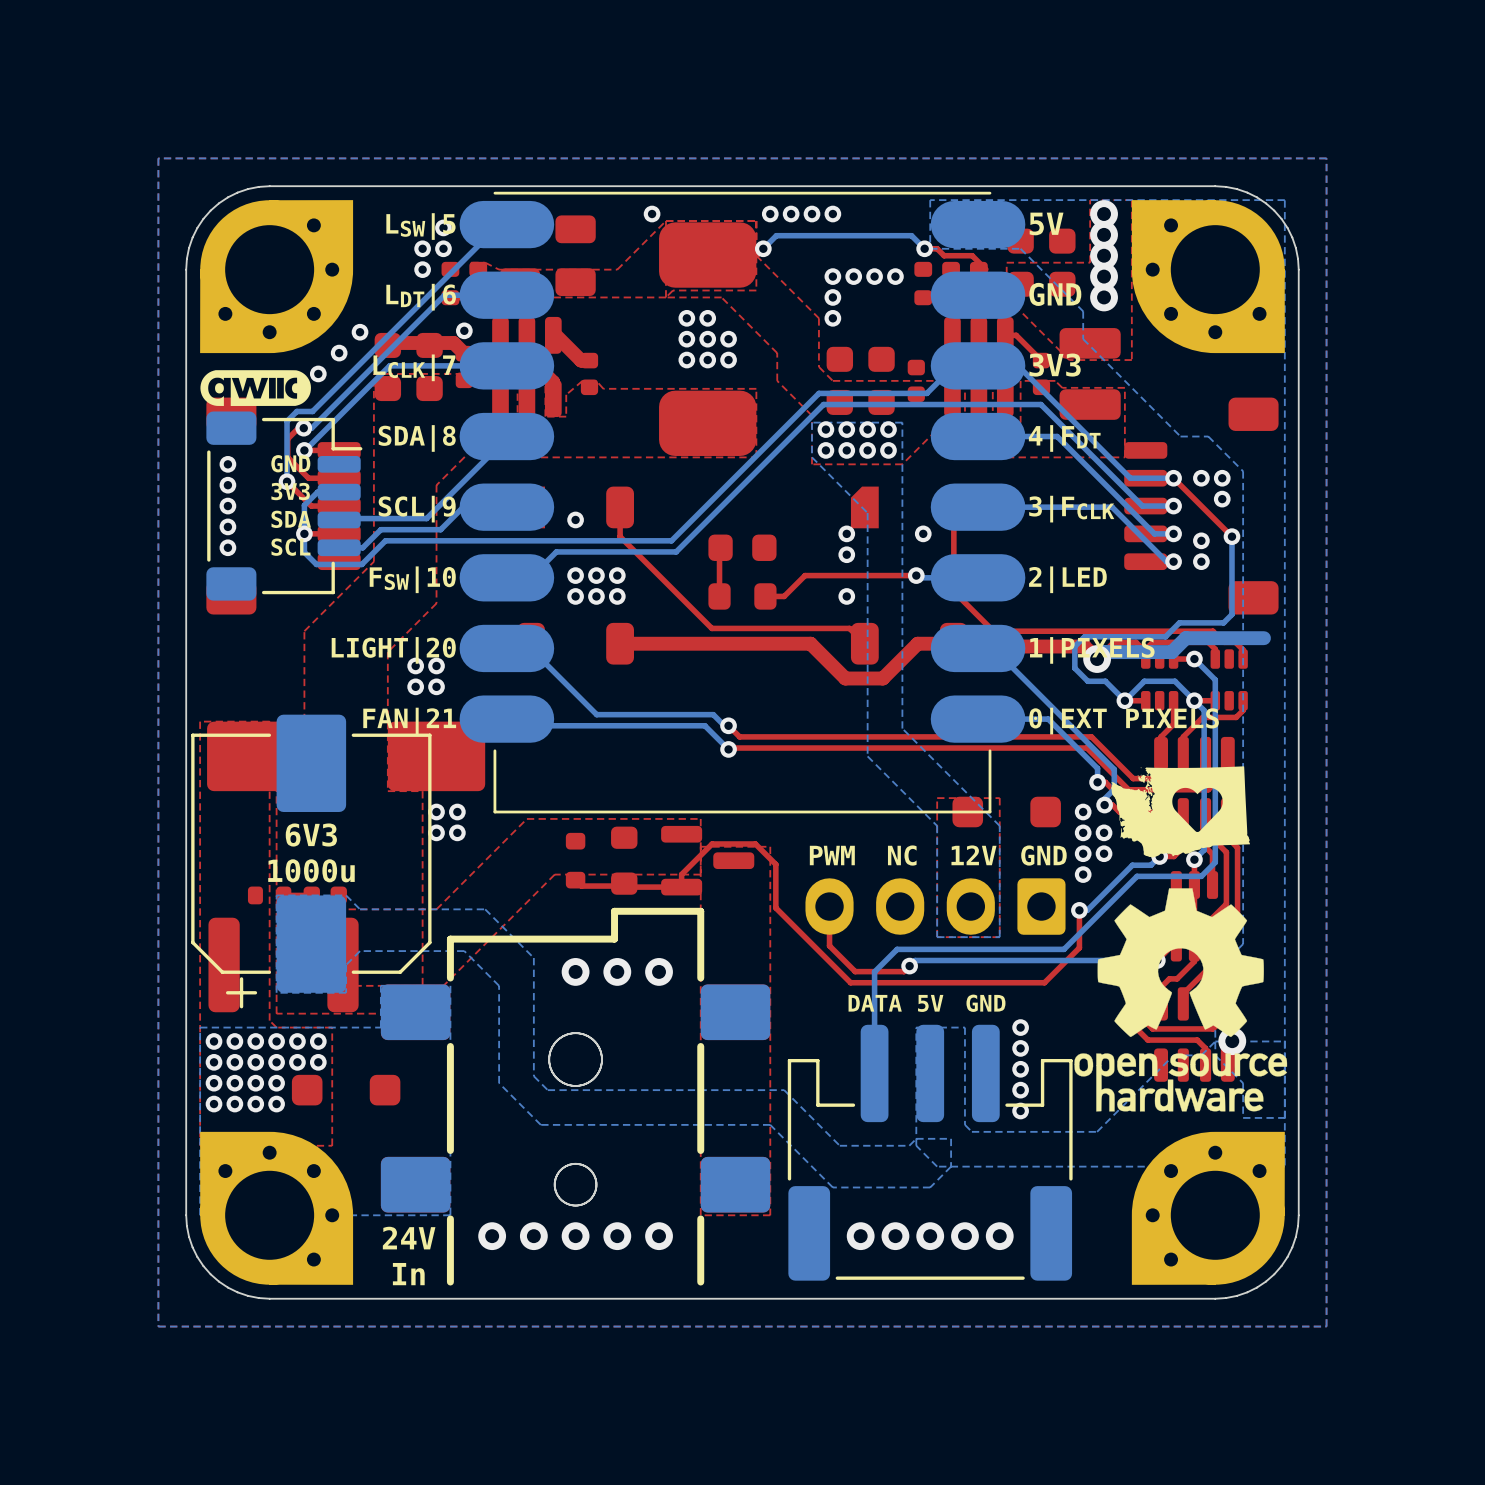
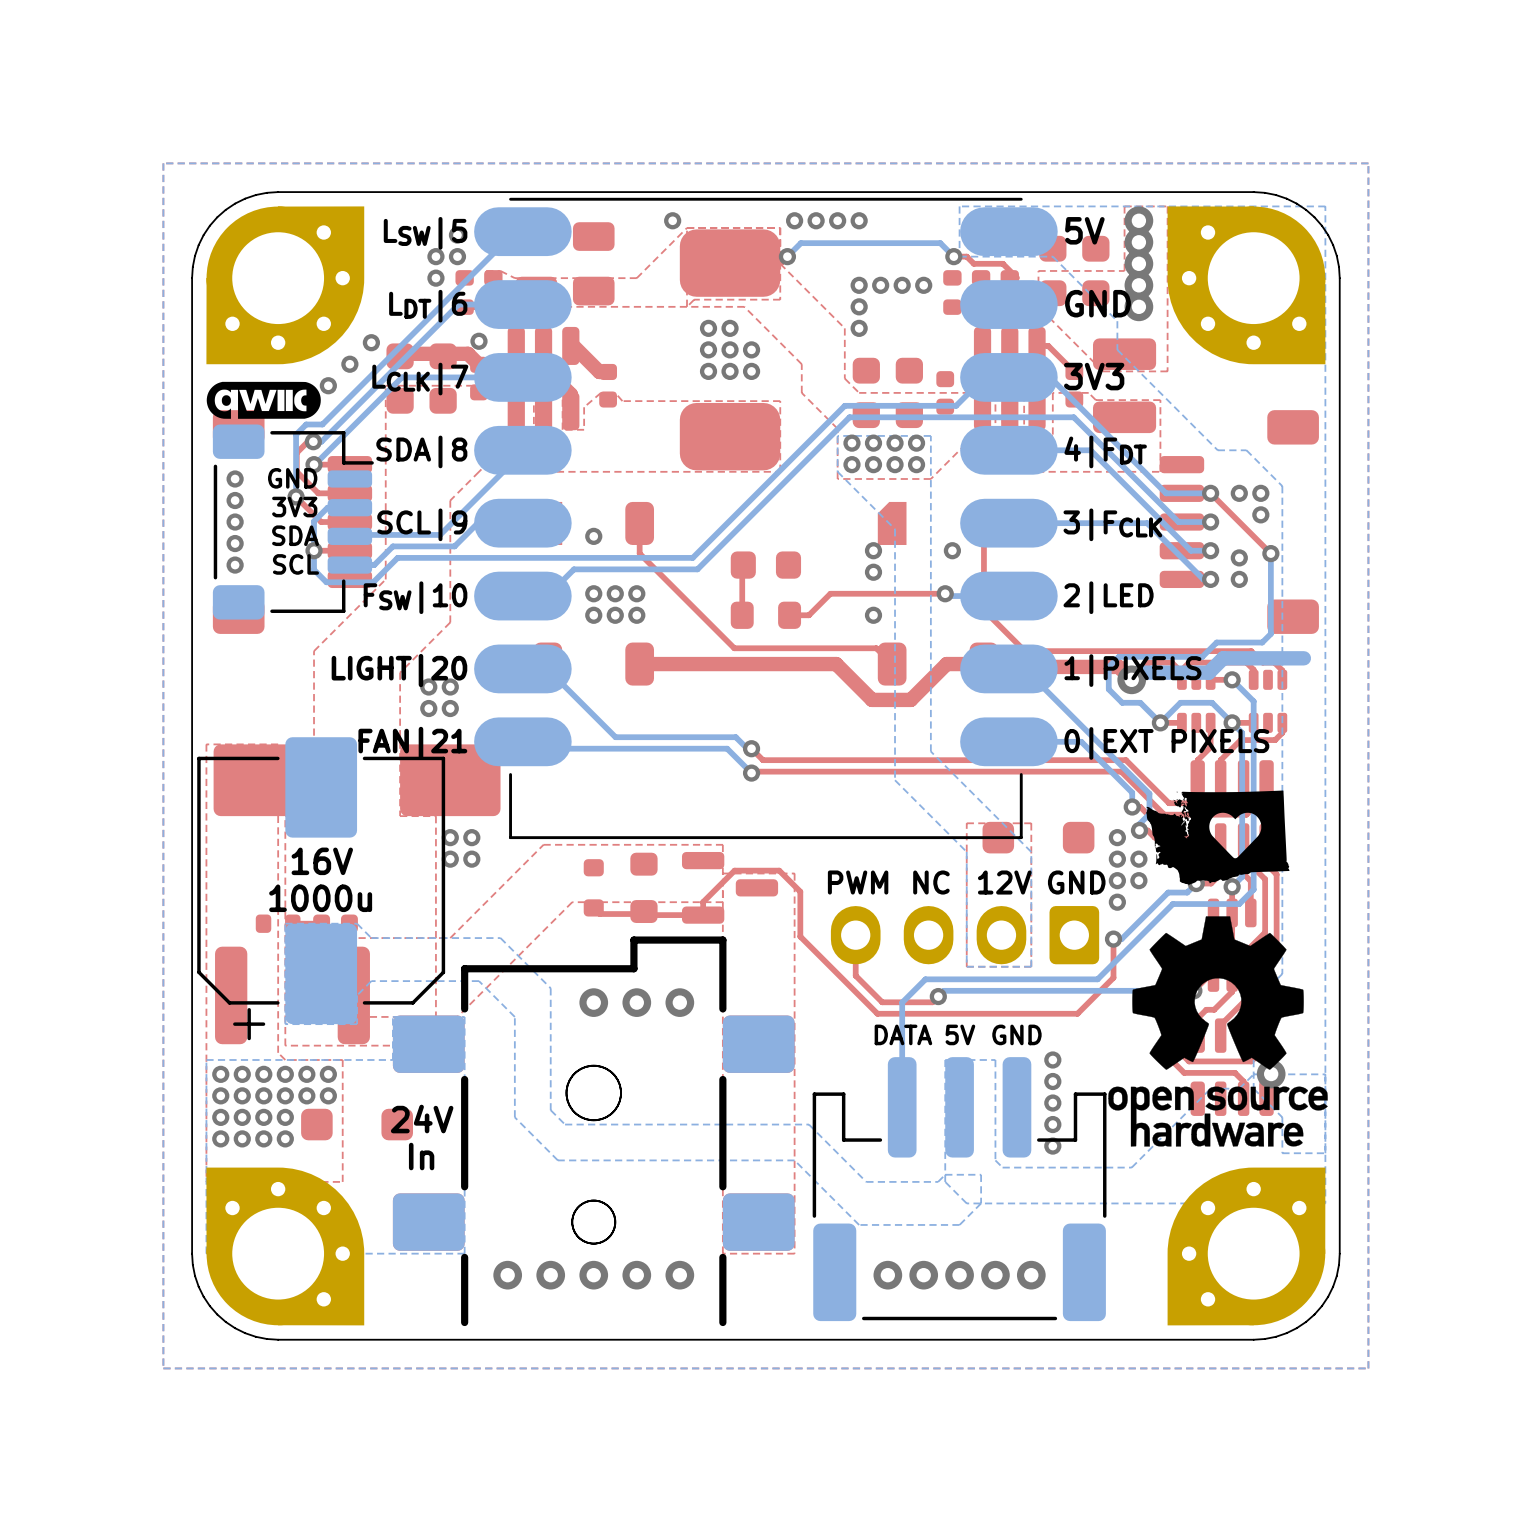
text: 6V3 (311, 835) -> 16V (322, 861)
text position: 24V (409, 1238) -> 24V (422, 1119)
text position: In (408, 1274) -> In (421, 1156)

